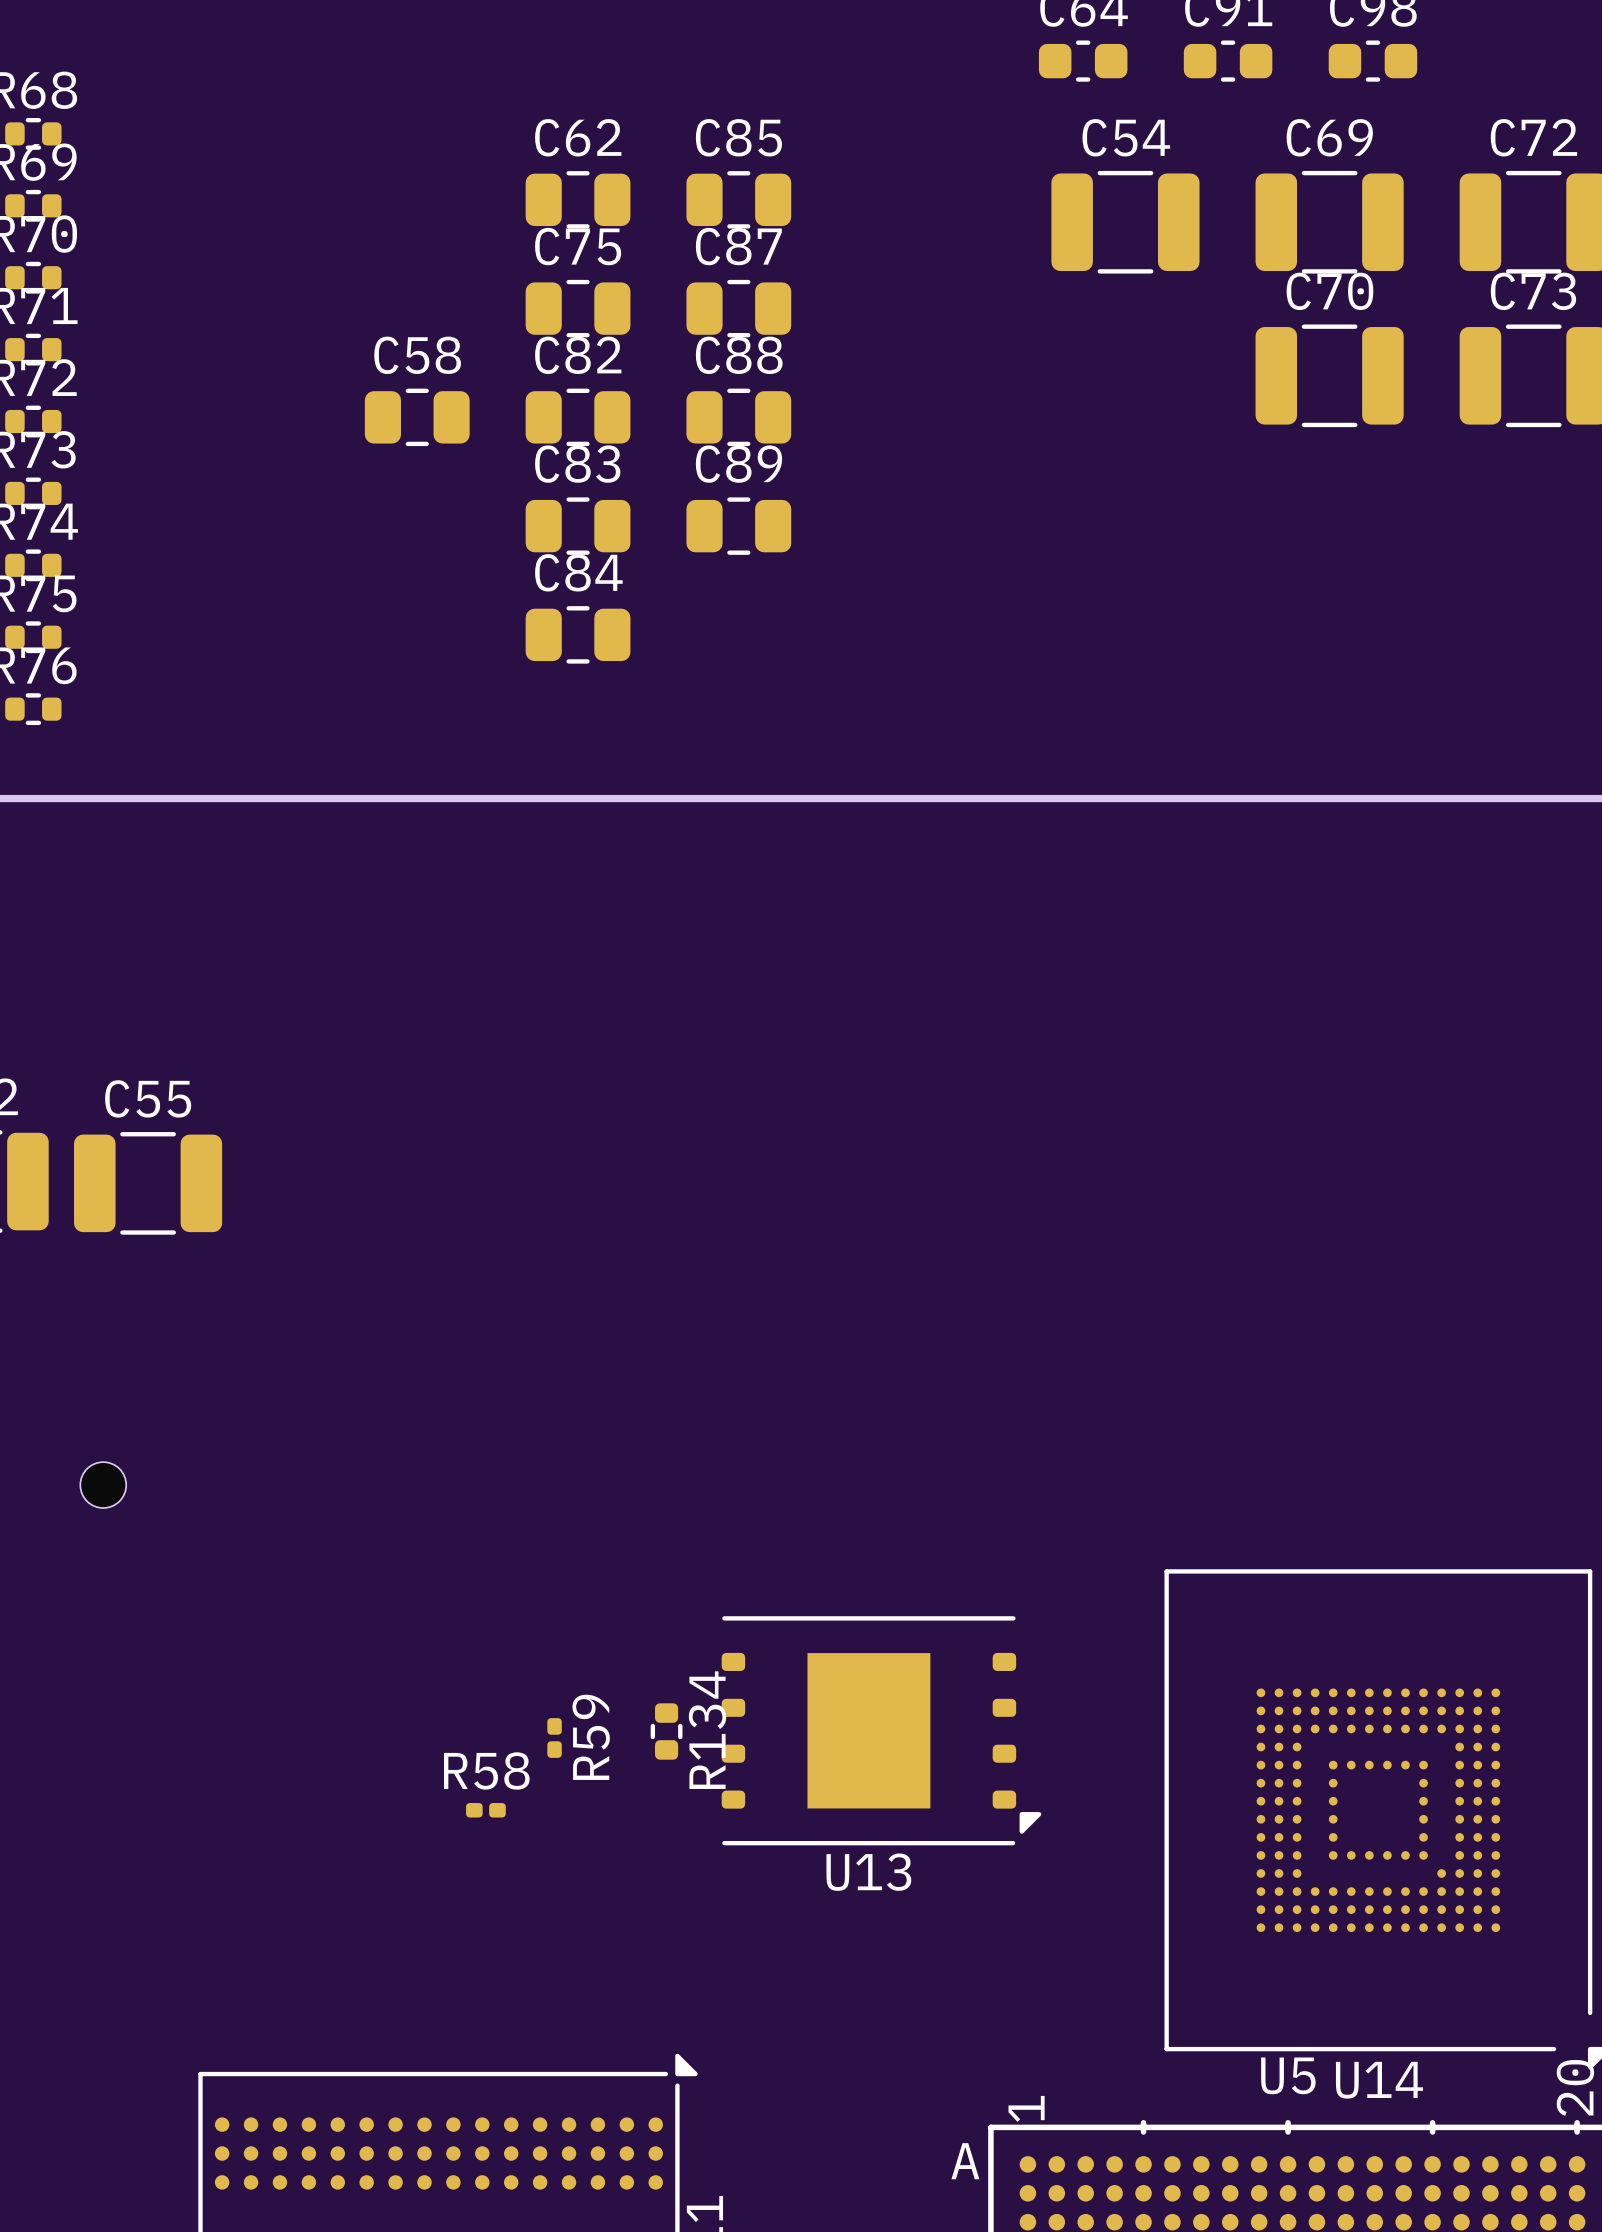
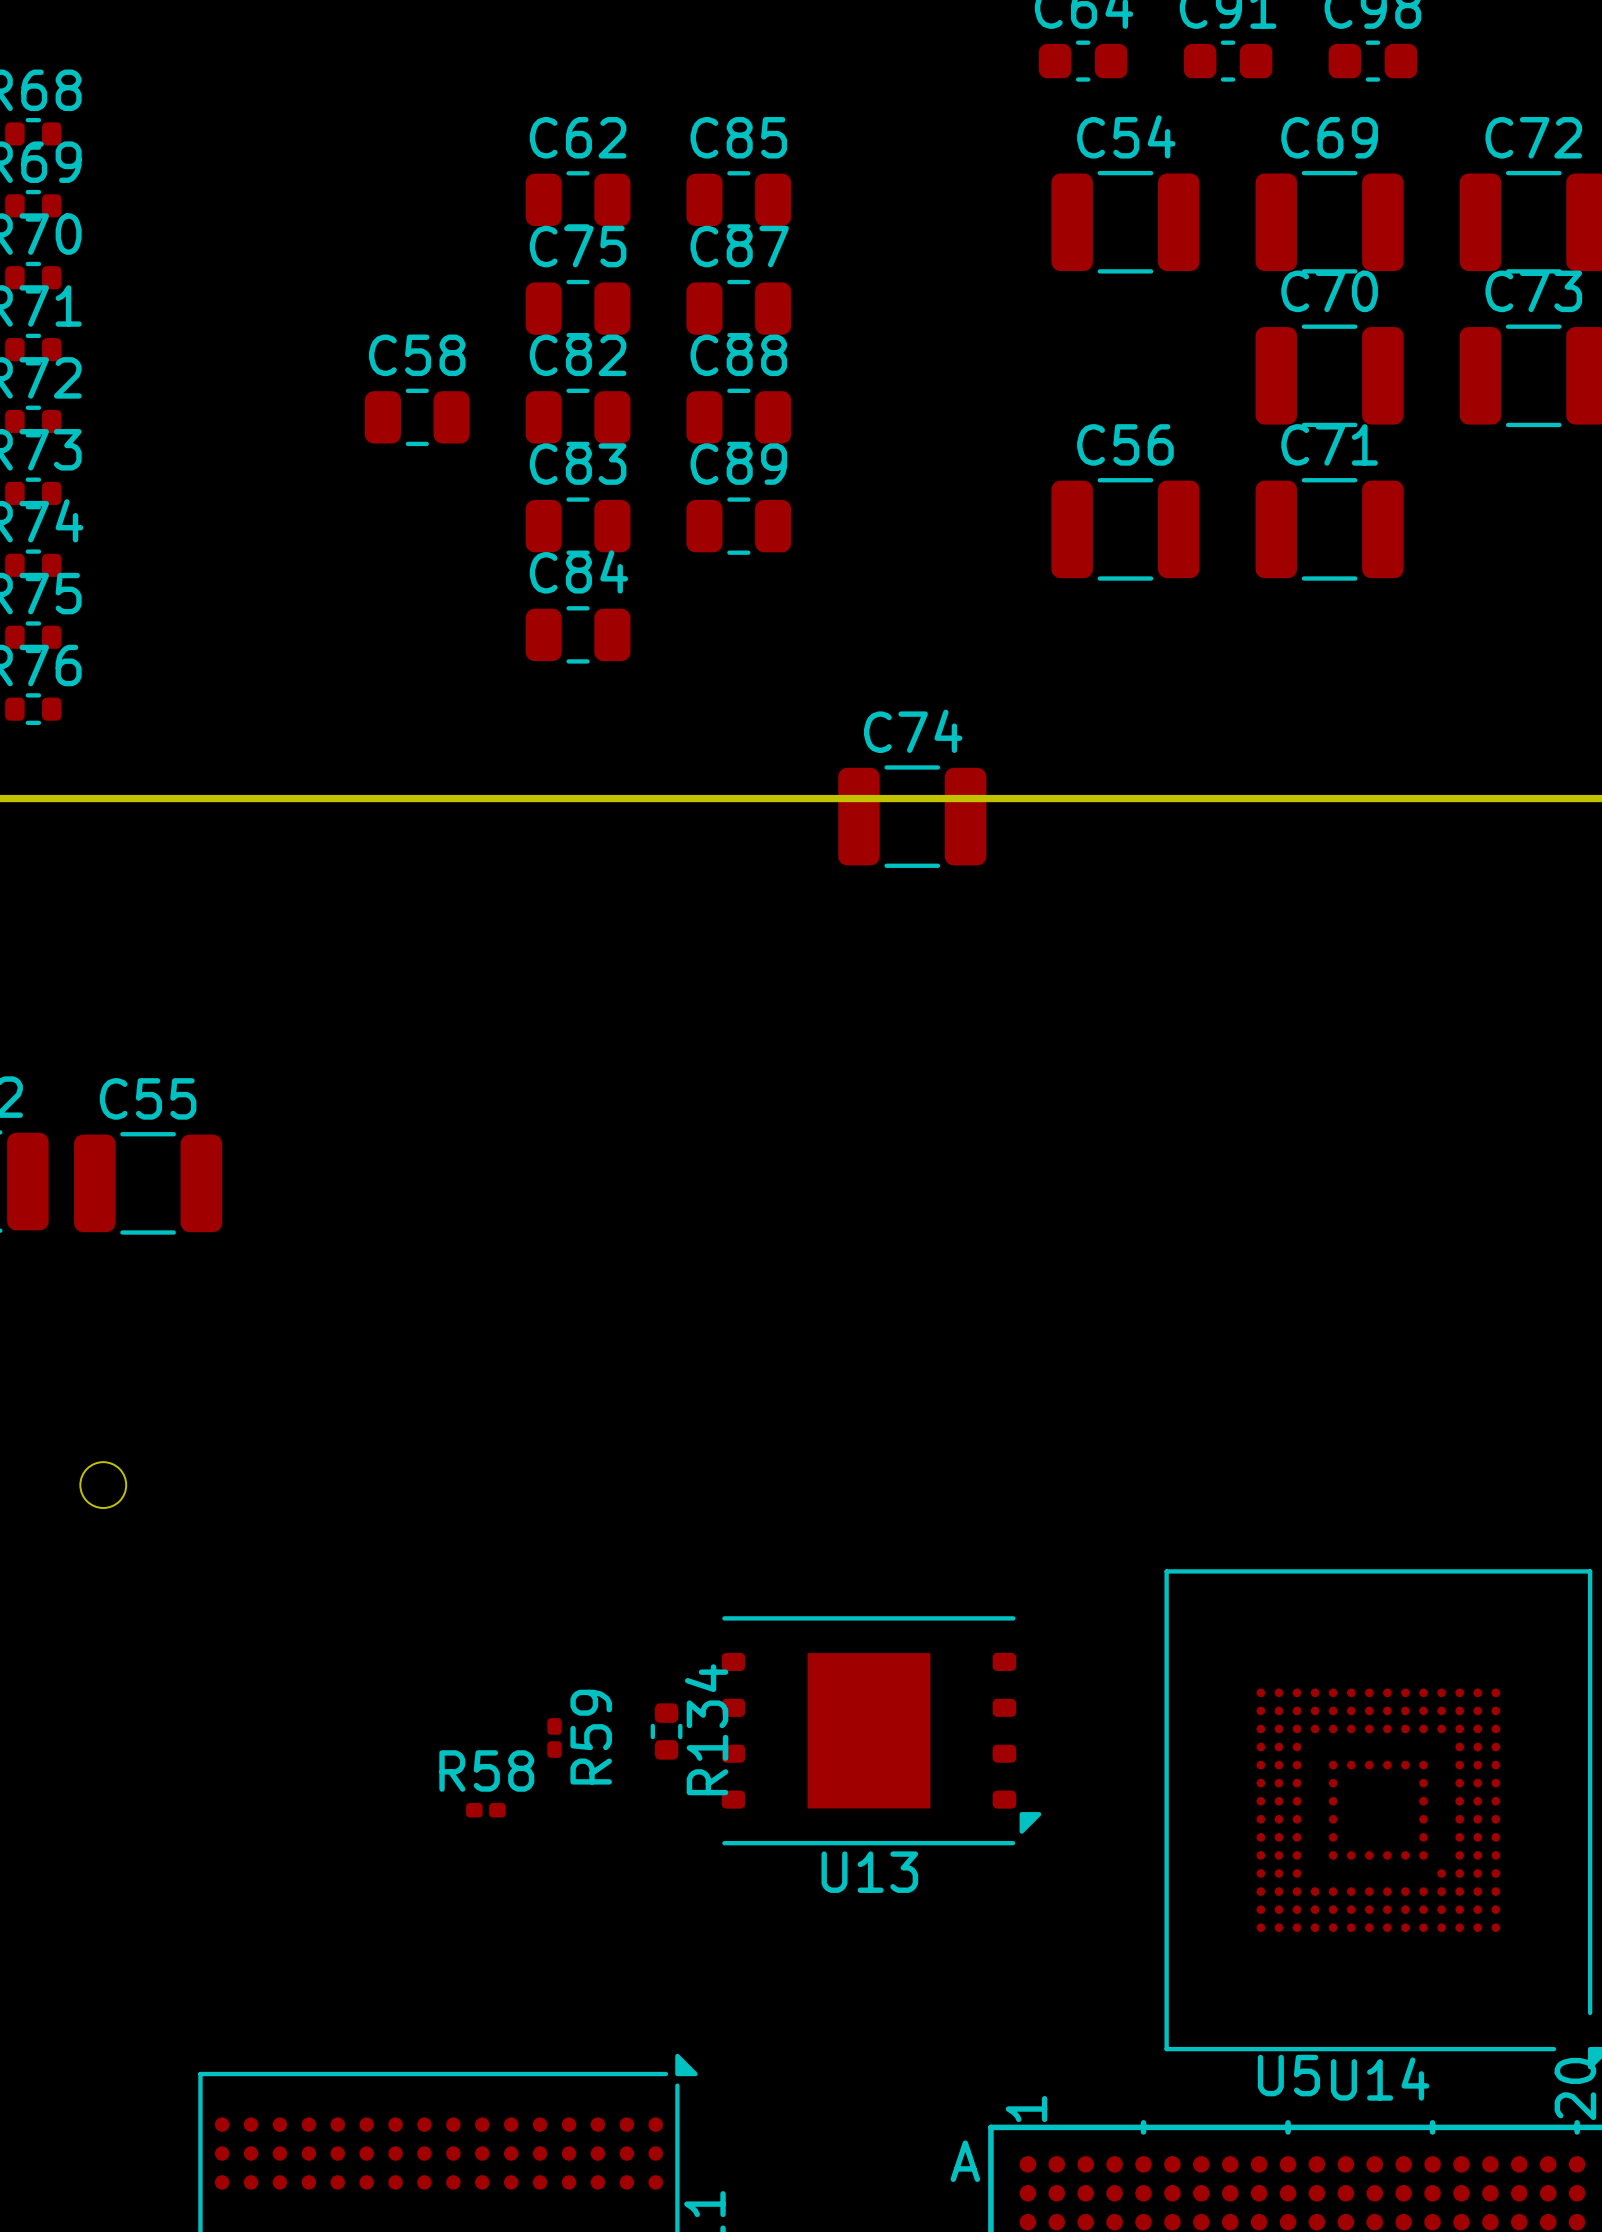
C56: none -> (1125, 529)
C71: none -> (1329, 529)
C74: none -> (912, 816)

